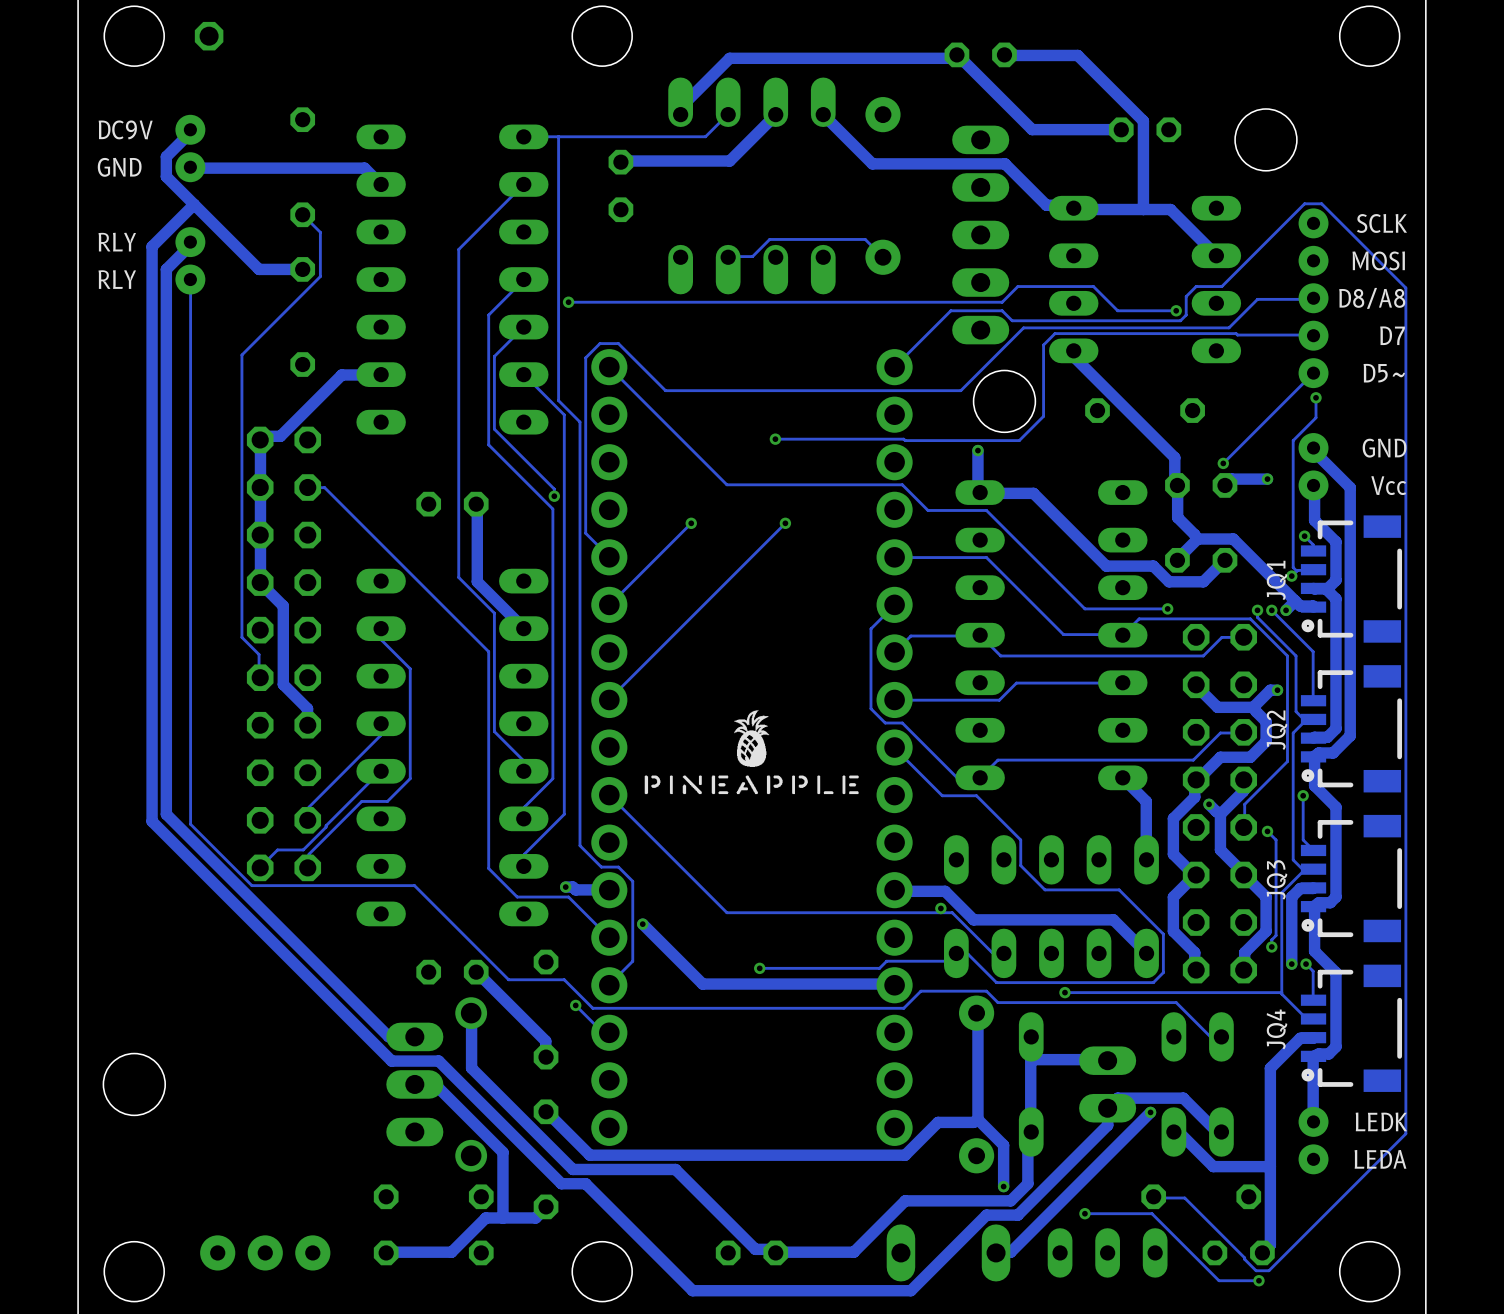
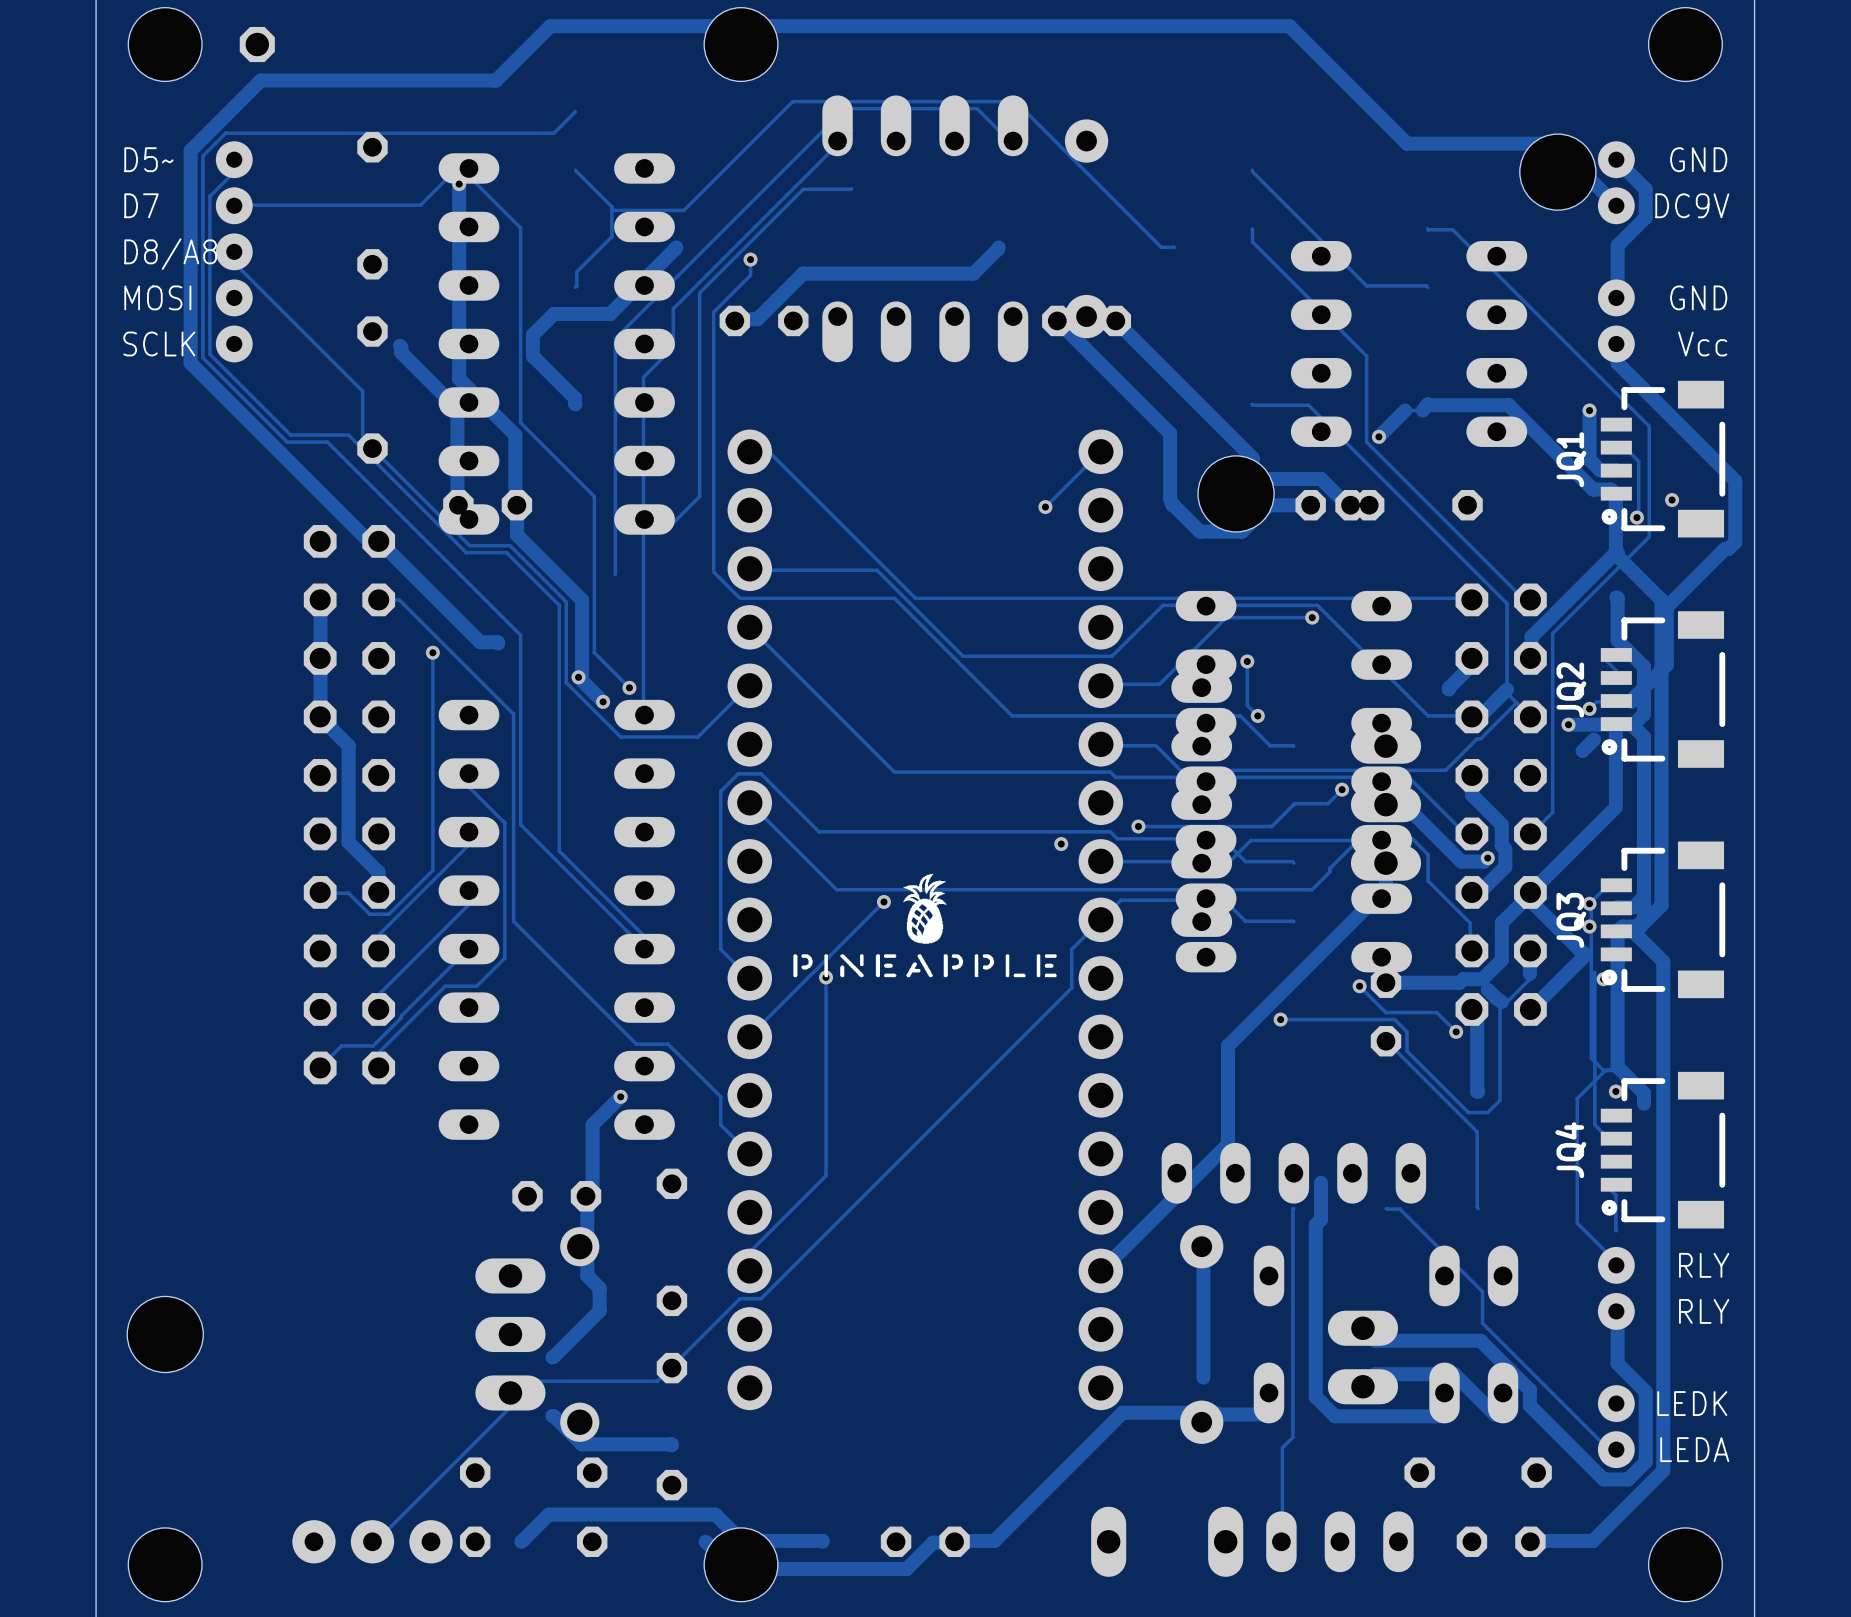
part: (980, 54) -> none
track: (1004, 54) (1077, 55) (1143, 121) (1143, 209) -> none
track: none -> (575, 111) (553, 133) (225, 133) (202, 156) (202, 357) (287, 442) (327, 442) (520, 635) (520, 824) (643, 947)
track: none -> (851, 130) (673, 308) (673, 347) (643, 377) (644, 715)
track: none -> (998, 130) (976, 108) (843, 108) (615, 338) (615, 574)
track: (680, 114) (681, 106) (729, 58) (952, 58) (956, 54) (1032, 129) (1121, 129) -> none
track: (728, 114) (705, 136) (523, 136) -> none
track: (775, 114) (729, 161) (620, 162) -> none
track: (823, 114) (872, 163) (1005, 163) (1046, 205) (1069, 205) (1074, 209) (1170, 209) (1216, 255) -> none
text: DC9V (125, 129) -> D5~ (148, 159)
part: (1145, 129) -> none
track: none -> (1616, 159) (1645, 189) (1645, 217) (1617, 245) (1616, 297)
text: none -> GND (1698, 159)
track: (189, 133) (166, 156) (166, 176) (259, 269) (302, 269) -> none
track: (558, 136) (558, 400) (579, 422) -> (750, 259) (750, 275) (713, 312) (713, 519)
track: none -> (575, 170) (611, 206) (611, 236) (576, 271) (575, 287)
track: none -> (1252, 170) (1366, 285) (1427, 287)
part: (190, 148) -> none
part: none -> (1616, 182)
track: none -> (459, 184) (459, 378) (515, 435) (516, 505)
via: none -> (459, 184)
track: none -> (851, 188) (803, 189) (699, 292) (699, 496) (671, 523)
text: GND (119, 167) -> D7 (141, 205)
track: (190, 167) (364, 168) (381, 184) -> (234, 205) (420, 205) (453, 171) (464, 171) (520, 227) (520, 422) (594, 496) (594, 652) (629, 687)
track: none -> (1616, 205) (1554, 143) (1407, 143) (1289, 26) (550, 26) (496, 80) (260, 80) (190, 150) (190, 363) (367, 540) (380, 542) (480, 642) (498, 643)
text: none -> DC9V (1692, 205)
track: none -> (611, 210) (683, 210) (792, 101) (1015, 101) (1161, 247) (1174, 247)
track: (523, 184) (458, 249) (458, 577) (494, 613) (494, 731) -> (232, 164) (232, 173) (209, 196) (209, 354) (290, 435) (348, 435) (466, 552) (506, 552) (559, 605) (559, 851) (608, 900)
part rotation: 0° (620, 185) -> 90° clockwise (764, 320)
part position: (620, 185) -> (764, 320)
track: none -> (1252, 228) (1252, 242) (1366, 356) (1366, 442) (1522, 598) (1530, 599)
track: none -> (1427, 228) (1452, 229) (1649, 426) (1649, 536) (1552, 633) (1552, 812) (1530, 833)
track: none -> (676, 247) (610, 313) (553, 313) (532, 335) (532, 356) (575, 398) (575, 404)
track: none -> (998, 247) (973, 273) (803, 273) (757, 319) (736, 319) (734, 320)
text: none -> D8/A8 (170, 254)
part: none -> (234, 251)
track: (194, 204) (152, 246) (152, 821) (391, 1061) (438, 1061) (561, 1183) (585, 1183) (692, 1290) (910, 1290) (986, 1215) (1017, 1215) (1107, 1125) (1107, 1108) -> none
track: (302, 214) (320, 232) (320, 276) (241, 355) (241, 637) (259, 654) (260, 677) -> none
text: SCLK (1382, 223) -> none
part: (980, 234) -> none
text: RLY (117, 242) -> MOSI (157, 297)
track: (190, 242) (189, 246) (166, 269) (166, 814) (388, 1036) (414, 1036) -> none
text: none -> GND (1698, 297)
track: (882, 257) (865, 239) (769, 239) (752, 256) (728, 257) -> none
part: (190, 260) -> none
track: none -> (1057, 321) (1170, 433) (1170, 498) (1172, 505) (1199, 531) (1242, 531) (1268, 505) (1310, 505)
part: none -> (1086, 320)
track: none -> (1115, 321) (1252, 457) (1252, 473) (1256, 478) (1321, 478) (1345, 503) (1368, 503) (1369, 505)
part: none -> (1616, 320)
text: MOSI (1378, 260) -> none
text: RLY (117, 279) -> SCLK (159, 343)
track: (190, 279) (190, 824) (251, 885) (414, 885) (508, 979) (564, 979) (592, 1008) (903, 1008) (920, 991) (986, 991) (997, 1002) (1176, 1002) (1210, 1036) (1221, 1036) -> none
track: (523, 279) (488, 315) (488, 444) (552, 509) (552, 778) (524, 807) (523, 818) -> none
track: none -> (1616, 343) (1617, 363) (1735, 480) (1735, 542) (1728, 549) (1724, 549) (1666, 607) (1666, 665) (1631, 701)
track: none -> (399, 345) (401, 352) (457, 408) (458, 505)
track: (1313, 298) (1257, 299) (1229, 327) (1023, 327) (960, 390) (665, 390) (618, 343) (599, 343) (585, 357) (585, 533) (609, 557) -> (234, 251) (234, 263) (362, 391) (362, 438) (469, 545) (510, 545) (566, 601) (566, 682) (620, 736) (697, 736) (749, 685)
part: (1313, 298) -> none
text: D8/A8 (1372, 298) -> none
track: (568, 302) (1002, 302) (1017, 286) (1093, 286) (1117, 310) (1176, 310) -> none
via position: (568, 302) -> (750, 259)
via: (1176, 310) -> none
track: (523, 327) (494, 356) (494, 429) (554, 489) (554, 496) -> none
track: none -> (1252, 404) (1308, 405) (1507, 603) (1507, 693) (1530, 716)
track: (1141, 333) (1054, 333) (1043, 345) (1043, 416) (1019, 440) (775, 439) -> (1405, 410) (1378, 436)
track: (1156, 333) (1313, 335) -> (1422, 410) (1427, 404) (1508, 405) (1593, 489) (1610, 489) (1616, 493) (1615, 552) (1531, 636) (1530, 658)
track: none -> (1589, 410) (1589, 459) (1600, 470) (1616, 470)
via: none -> (1589, 410)
text: D7 (1392, 335) -> none
track: (1073, 350) (1074, 357) (1174, 457) (1177, 517) (1197, 539) (1233, 539) (1300, 606) (1313, 607) -> none
via: none -> (1378, 436)
track: none -> (1616, 447) (1626, 449) (1638, 461) (1638, 515) (1636, 517)
track: (609, 367) (726, 484) (902, 484) (928, 510) (986, 510) (1084, 608) (1167, 608) -> (750, 452) (769, 452) (915, 598) (1470, 598) (1471, 599)
track: (894, 367) (950, 310) (1002, 310) (1012, 320) (1180, 320) (1186, 315) (1186, 296) (1196, 286) (1221, 286) (1304, 203) (1321, 203) (1405, 287) (1405, 1133) (1268, 1270) (1256, 1270) (1184, 1198) (1153, 1196) -> (1100, 451) (1045, 507)
track: (1313, 373) (1223, 463) -> none
text: D5~ (1384, 373) -> none
track: (381, 374) (341, 374) (280, 436) (264, 436) (260, 439) (260, 487) -> none
track: (523, 374) (564, 414) (564, 814) (524, 854) (523, 866) -> none
track: (1316, 397) (1316, 417) (1293, 440) (1293, 567) (1296, 571) -> none
via: (1316, 397) -> none
via: none -> (1672, 500)
track: none -> (517, 505) (517, 535) (582, 600) (582, 680) (603, 701)
part: none -> (1339, 505)
via: none -> (1045, 507)
via: none -> (1636, 517)
via: (775, 439) -> none
text: GND (1384, 448) -> none
track: (977, 450) (977, 487) (980, 493) (1033, 493) (1106, 566) (1153, 566) (1169, 581) -> (749, 568) (876, 570) (962, 656) (1112, 656) (1163, 605) (1317, 605) (1428, 715) (1438, 715)
via: (977, 450) -> none
via: (1223, 463) -> none
track: (579, 464) (579, 845) (601, 867) (618, 867) (632, 881) (632, 961) (609, 985) -> (713, 572) (740, 598) (894, 598) (1012, 715) (1240, 715) (1270, 745) (1293, 746)
part: (1313, 466) -> none
track: (1267, 479) (1231, 479) (1224, 485) -> none
via: (1267, 479) -> none
part: (1201, 485) -> none
text position: Vcc (1388, 485) -> Vcc (1702, 343)
via: (554, 496) -> none
via: none -> (1312, 617)
part position: (452, 504) -> (487, 505)
track: (476, 504) (477, 581) (523, 628) -> none
track: none -> (749, 627) (894, 772) (1110, 772) (1115, 777) (1408, 777) (1464, 833) (1471, 833)
track: (691, 523) (609, 604) -> none
via: (691, 523) -> none
track: (785, 523) (609, 699) -> none
via: (785, 523) -> none
track: none -> (432, 652) (432, 870) (388, 914) (369, 914) (348, 893) (320, 892)
via: none -> (432, 652)
via: (1304, 536) -> none
track: none -> (1247, 661) (1247, 705) (1257, 715)
via: none -> (1247, 661)
via: none -> (578, 677)
track: (894, 557) (986, 557) (1063, 634) (1122, 635) (1139, 618) (1250, 618) (1287, 655) (1287, 761) (1244, 804) (1243, 827) -> (1100, 685) (1159, 684) (1226, 617) (1312, 617)
via: none -> (629, 687)
part: (1201, 560) -> none
via: none -> (603, 701)
track: none -> (1516, 702) (1445, 770) (1180, 770) (1156, 745) (1100, 744)
JQ1 position: (1351, 579) -> (1663, 459)
track: (417, 580) (488, 651) (488, 868) (517, 897) (568, 897) (585, 914) -> (513, 714) (513, 921) (636, 1044) (668, 1044) (720, 1096) (720, 1124)
via: none -> (1257, 715)
track width: thick (1194, 581) (1169, 581) -> thin (1470, 715) (1438, 715)
via: none -> (1568, 724)
track: (894, 604) (870, 628) (870, 708) (885, 723) -> (749, 802) (836, 889) (1089, 889)
via: (1167, 608) -> none
track: (1257, 610) (1257, 617) (1296, 655) (1296, 711) (1304, 720) (1313, 719) -> none
via: (1257, 610) -> none
track: (1271, 610) (1313, 651) -> (1568, 724) (1616, 724) (1615, 801)
via: (1271, 610) -> none
via: (1286, 610) -> none
track: none -> (1471, 775) (1471, 794) (1501, 824) (1501, 845) (1505, 849) (1505, 866) (1480, 891) (1471, 892)
track: (1243, 637) (1221, 637) (1203, 655) (1000, 655) (980, 635) (910, 636) (894, 652) -> none
track: none -> (1342, 789) (1328, 803) (1294, 803) (1271, 826) (1138, 826)
via: none -> (1342, 789)
track: none -> (1386, 804) (1405, 805) (1461, 861) (1484, 861) (1487, 858)
part: none -> (1386, 804)
track: (1313, 655) (1313, 700) -> (1615, 807) (1530, 892)
via: none -> (1138, 826)
track: none -> (469, 832) (467, 845) (380, 933) (378, 950)
track: (1196, 684) (1217, 707) (1253, 707) -> none
via: none -> (1061, 844)
track: (1277, 690) (1270, 690) (1253, 707) -> none
via: (1277, 690) -> none
via: none -> (1487, 858)
track: none -> (1385, 863) (1385, 887) (1227, 1045) (1227, 1144) (1100, 1270)
track: (1253, 707) (1266, 721) (1266, 741) (1250, 757) (1220, 757) (1200, 777) (1194, 780) (1194, 797) (1173, 818) (1173, 854) (1196, 874) (1173, 897) (1173, 931) (1194, 952) (1196, 970) -> none
track: (902, 723) (956, 777) (980, 777) (997, 760) (1193, 760) (1220, 733) (1243, 732) -> (1110, 889) (1312, 889) (1329, 872) (1329, 868) (1359, 838) (1412, 838) (1428, 854) (1428, 880) (1470, 923) (1470, 949) (1471, 950)
track: none -> (1530, 892) (1501, 923) (1501, 959) (1482, 979) (1463, 979) (1459, 982) (1386, 982)
track: none -> (1530, 892) (1531, 901) (1586, 954) (1530, 1009)
track: none -> (1643, 896) (1643, 919) (1633, 930) (1663, 961) (1663, 1470) (1593, 1540) (1530, 1541)
JQ2 position: (1351, 728) -> (1663, 689)
track: none -> (883, 901) (749, 1036)
via: none -> (883, 901)
via: none -> (1589, 903)
track: (894, 747) (942, 795) (976, 795) (1020, 839) (1020, 865) (1044, 889) (1119, 889) (1163, 934) (1163, 972) (1153, 982) (1137, 982) -> (1615, 1449) (1608, 1449) (1482, 1323) (1482, 1291) (1400, 1209)
track: none -> (1293, 921) (1245, 921) (1224, 900) (1120, 900) (1071, 949) (1071, 987) (761, 1298) (740, 1298) (657, 1381) (536, 1381) (376, 1540) (372, 1541)
via: none -> (1589, 926)
track: (1122, 777) (1146, 801) (1146, 859) -> none
track: (1314, 785) (1335, 807) (1335, 888) -> (1617, 966) (1617, 1066) (1643, 1093)
track: none -> (1594, 972) (1594, 1124) (1607, 1137) (1616, 1138)
track: (1243, 791) (1220, 814) (1220, 849) (1266, 897) (1266, 931) (1244, 952) (1243, 970) -> (1529, 973) (1529, 979) (1500, 1009) (1500, 1100) (1487, 1112) (1468, 1112) (1407, 1051) (1407, 1031) (1394, 1019) (1280, 1019)
via: none -> (826, 977)
track: (609, 795) (726, 912) (952, 912) (992, 952) (1003, 953) -> (749, 978) (720, 949) (720, 791) (738, 773) (761, 773) (819, 831) (1110, 831) (1117, 838) (1222, 838) (1245, 861) (1292, 861) (1293, 863)
track: (1303, 795) (1303, 839) (1313, 850) -> none
track: none -> (1359, 986) (1385, 1012) (1436, 1012) (1456, 1031)
via: none -> (1359, 986)
part position: (1219, 803) -> (1501, 804)
via: (1209, 804) -> none
track: none -> (1471, 1009) (1477, 1016) (1478, 1091)
part: none -> (1386, 1011)
via: none -> (1280, 1019)
track: (1267, 831) (1276, 839) (1276, 935) (1271, 939) (1271, 946) -> none
via: (1267, 831) -> none
via: none -> (1456, 1031)
track: none -> (1386, 1041) (1477, 1131) (1478, 1208)
part rotation: 0° (1051, 859) -> 90° clockwise (1201, 804)
part position: (1051, 859) -> (1201, 804)
JQ3 position: (1351, 878) -> (1663, 919)
track: (565, 887) (572, 887) (575, 889) (609, 890) -> none
via position: (565, 887) -> (620, 1096)
track: (1313, 887) (1300, 888) (1291, 897) (1291, 964) -> none
via: none -> (1615, 1091)
track: (894, 890) (945, 891) (973, 919) (1113, 919) (1146, 953) -> none
track: none -> (620, 1096) (592, 1124) (592, 1191) (586, 1196)
track: (1335, 897) (1330, 902) (1318, 902) (1313, 906) (1314, 951) (1335, 972) (1335, 1046) (1328, 1053) (1318, 1053) (1313, 1056) (1313, 1121) -> none
via: (940, 908) -> none
track: (642, 924) (702, 984) (894, 985) -> none
via: (642, 924) -> none
via: (1271, 946) -> none
track: none -> (1321, 1182) (1321, 1219) (1315, 1224) (1315, 1396) (1335, 1416) (1444, 1416)
via: (1291, 964) -> none
via: (1306, 964) -> none
track: (759, 968) (879, 968) (886, 961) (948, 961) (956, 953) (967, 954) (996, 982) (1127, 982) -> (1386, 1208) (1387, 1209)
via: (759, 968) -> none
track: (477, 972) (545, 1041) (546, 1057) -> (587, 1196) (587, 1275) (599, 1288) (599, 1310) (552, 1357)
track: none -> (1293, 1208) (1292, 1437) (1282, 1447) (1281, 1541)
via: (1064, 992) -> none
track: (1281, 992) (1064, 992) -> none
track: (575, 1005) (602, 1032) (609, 1032) -> (826, 977) (826, 1175) (750, 1251) (749, 1270)
via: (575, 1005) -> none
track: (471, 1013) (471, 1068) (572, 1169) (675, 1169) (755, 1249) (771, 1249) (775, 1252) (781, 1252) -> (705, 1541) (733, 1568) (906, 1568) (933, 1542) (961, 1540)
JQ4 position: (1351, 1028) -> (1663, 1150)
text: none -> RLY (1704, 1265)
track: (1313, 1037) (1300, 1038) (1270, 1068) (1270, 1245) (1262, 1252) -> none
part: none -> (1616, 1288)
track: (1107, 1060) (1035, 1059) (1031, 1036) (1031, 1132) (1027, 1136) (1027, 1183) (1010, 1200) (905, 1200) (853, 1252) (808, 1252) -> (1113, 1421) (994, 1540)
track: none -> (1616, 1311) (1617, 1363) (1645, 1391) (1645, 1461) (1628, 1479) (1603, 1479) (1529, 1405) (1529, 1389) (1480, 1340) (1375, 1340) (1363, 1328)
text: none -> RLY (1704, 1311)
track: (414, 1084) (435, 1085) (502, 1152) (502, 1217) -> none
part position: (1107, 1084) -> (1362, 1357)
track: (1107, 1108) (1117, 1098) (1183, 1098) (1216, 1130) (1221, 1132) -> none
track: (546, 1111) (589, 1155) (905, 1155) -> none
track: (1150, 1112) (1010, 1252) (996, 1252) -> none
via: (1150, 1112) -> none
text position: LEDK (1381, 1121) -> LEDK (1692, 1403)
track: none -> (1363, 1386) (1375, 1374) (1454, 1374) (1494, 1414) (1503, 1416)
track: (1173, 1132) (1179, 1132) (1213, 1166) (1270, 1166) -> none
part position: (1313, 1140) -> (1616, 1426)
track: (912, 1148) (938, 1122) (973, 1122) (977, 1119) (1003, 1145) (1003, 1186) -> (1122, 1412) (1215, 1412) (1217, 1414) (1268, 1416)
track: none -> (552, 1416) (582, 1444) (671, 1445)
text position: LEDA (1380, 1159) -> LEDA (1694, 1449)
via: (1003, 1186) -> none
track: (546, 1206) (535, 1217) (485, 1217) (451, 1252) (386, 1252) -> none
track: (1084, 1213) (1151, 1213) (1219, 1280) (1258, 1280) -> none
via: (1084, 1213) -> none
part position: (265, 1252) -> (372, 1541)
track: none -> (822, 1541) (741, 1540) (715, 1514) (548, 1514) (521, 1541)
part position: (1107, 1252) -> (1339, 1541)
part position: (1238, 1252) -> (1501, 1541)
via: (1258, 1280) -> none

